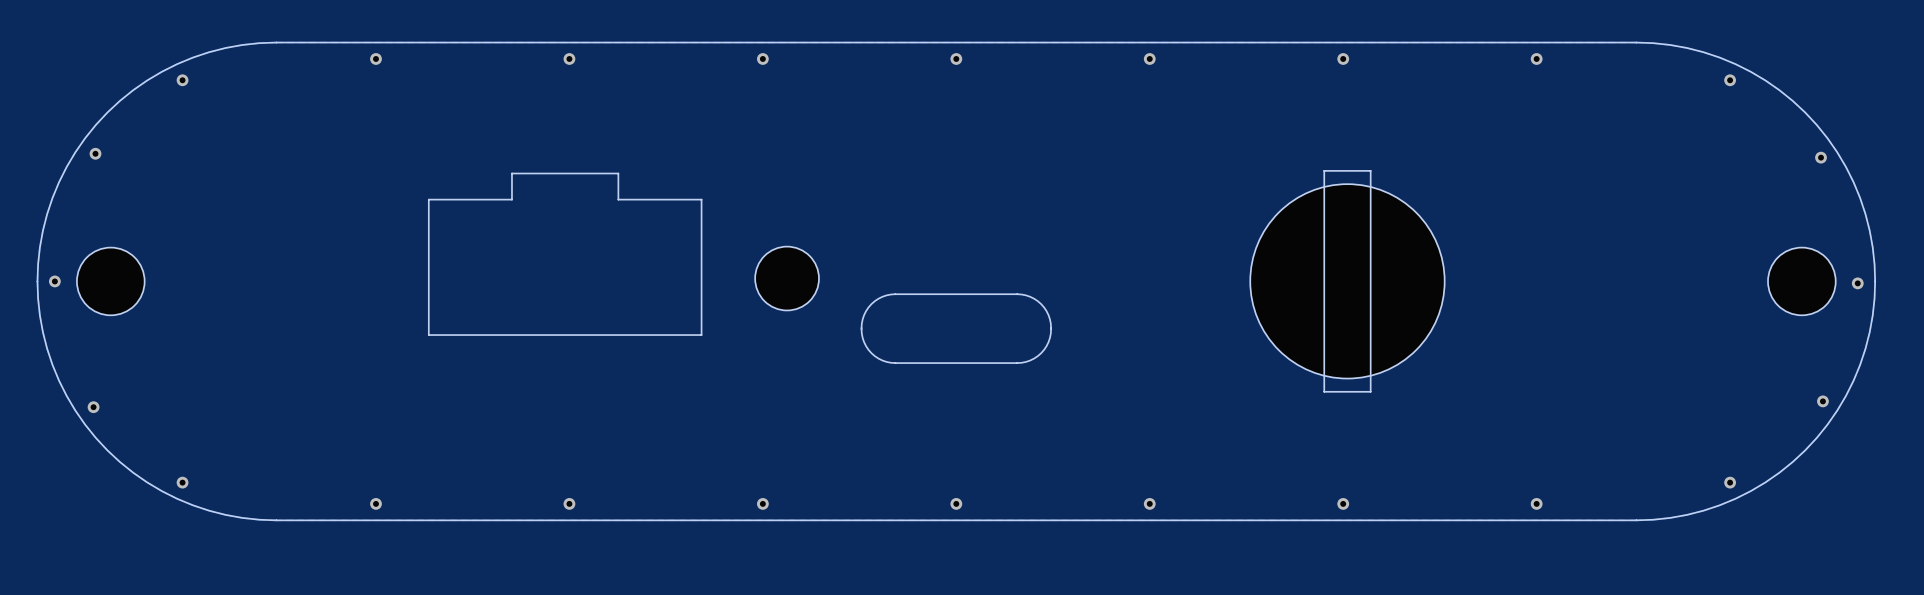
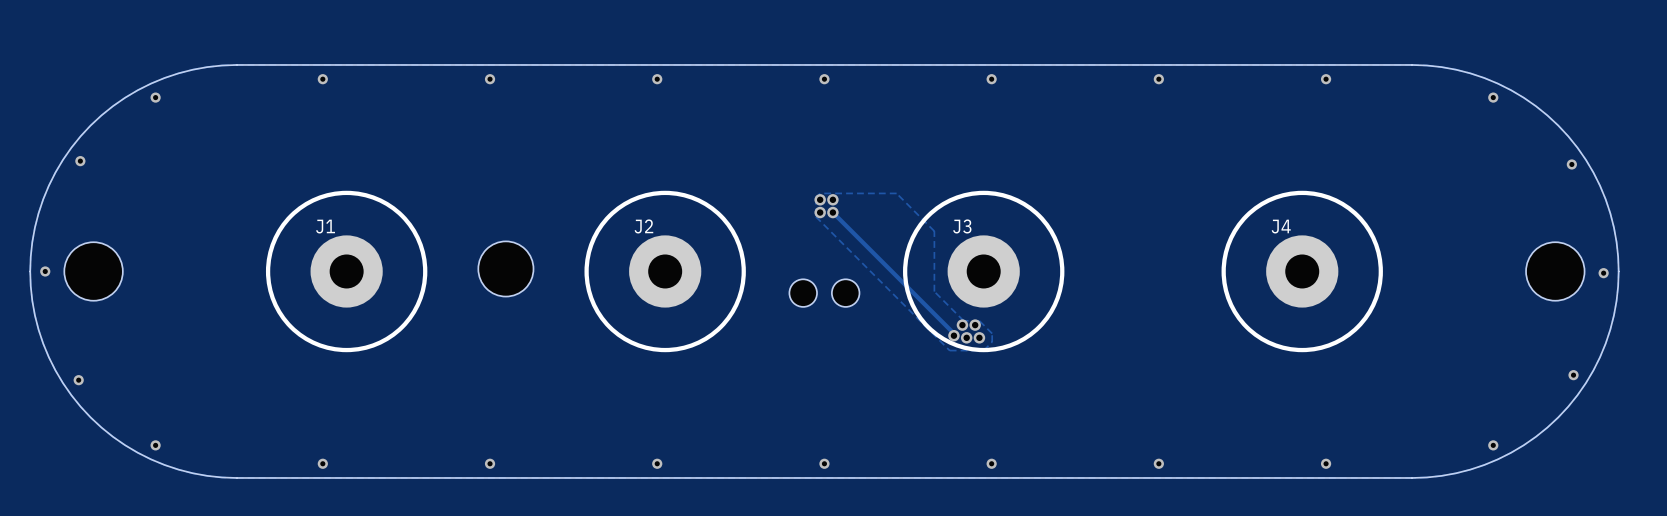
board edge: (1324, 170) (1370, 170) (1370, 391) (1324, 391) (1324, 170) -> none
board edge: (511, 173) (618, 173) (618, 199) (701, 199) (701, 335) (428, 335) (428, 199) (511, 199) (511, 173) -> none
zone outline: none -> (820, 193) (896, 193) (934, 231) (934, 291) (963, 320) (979, 320) (992, 333) (992, 342) (983, 350) (949, 350) (815, 216) (815, 197) (820, 193)
via: none -> (820, 199)
via: none -> (832, 199)
via: none -> (820, 212)
track: none -> (832, 212) (953, 335)
via: none -> (832, 212)
hole position: (787, 278) -> (505, 268)
J1: none -> (346, 271)
J2: none -> (665, 271)
J3: none -> (983, 271)
hole: (1347, 281) -> none
J4: none -> (1302, 271)
board edge: (895, 294) (1026, 295) (1037, 301) (1046, 311) (1050, 323) (1049, 337) (1044, 349) (1037, 356) (1021, 362) (886, 361) (874, 356) (866, 346) (861, 333) (861, 323) (866, 311) (874, 301) (886, 295) (895, 294) -> none
part: none -> (824, 293)
via: none -> (962, 325)
via: none -> (975, 325)
via: none -> (953, 335)
via: none -> (966, 337)
via: none -> (979, 337)

